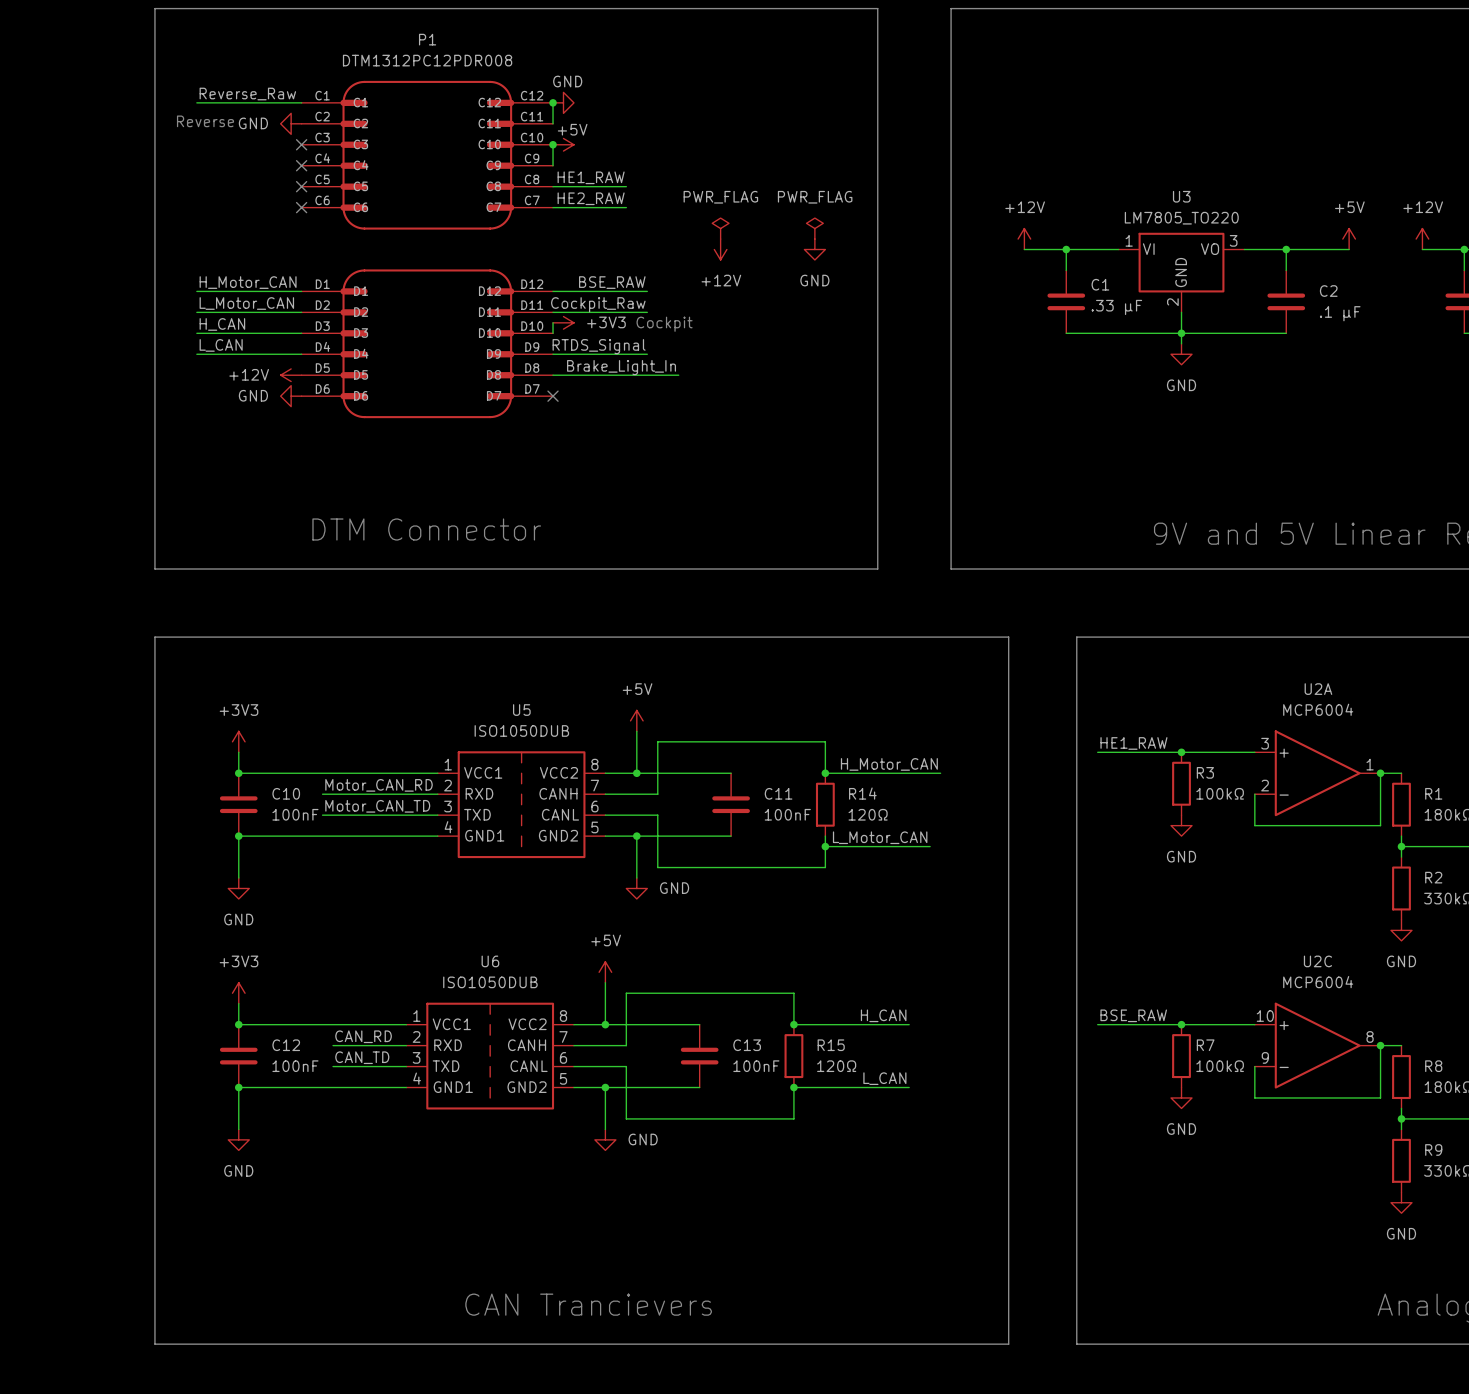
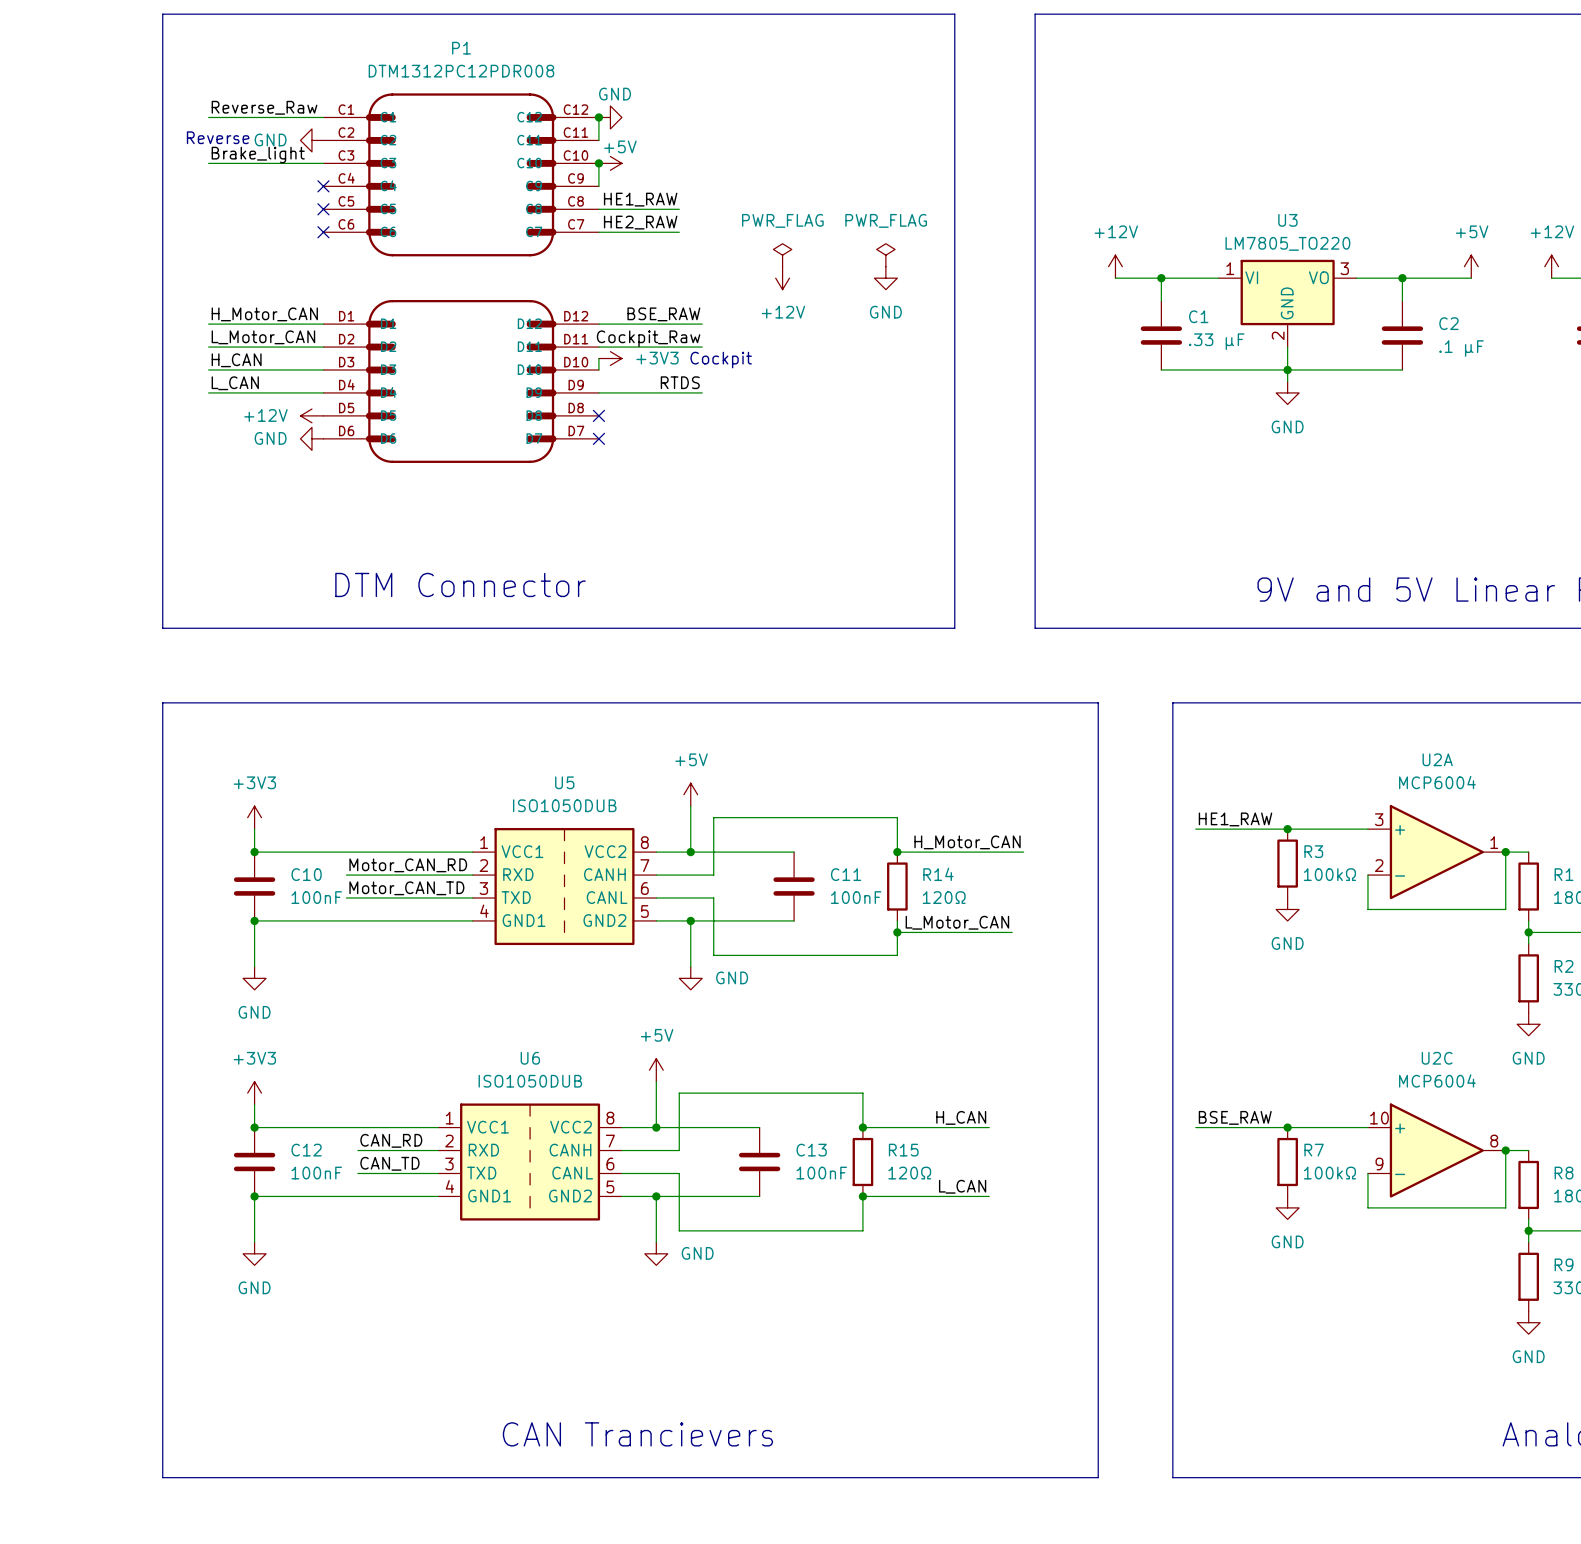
label: none -> Brake_light (258, 155)
wire: none -> (208, 163) (323, 163)
no-connect mark: (301, 144) -> none
label: RTDS_Signal (599, 346) -> RTDS (680, 382)
label: Brake_Light_In (621, 367) -> none
wire: (553, 375) (678, 375) -> none
no-connect mark: none -> (598, 415)

